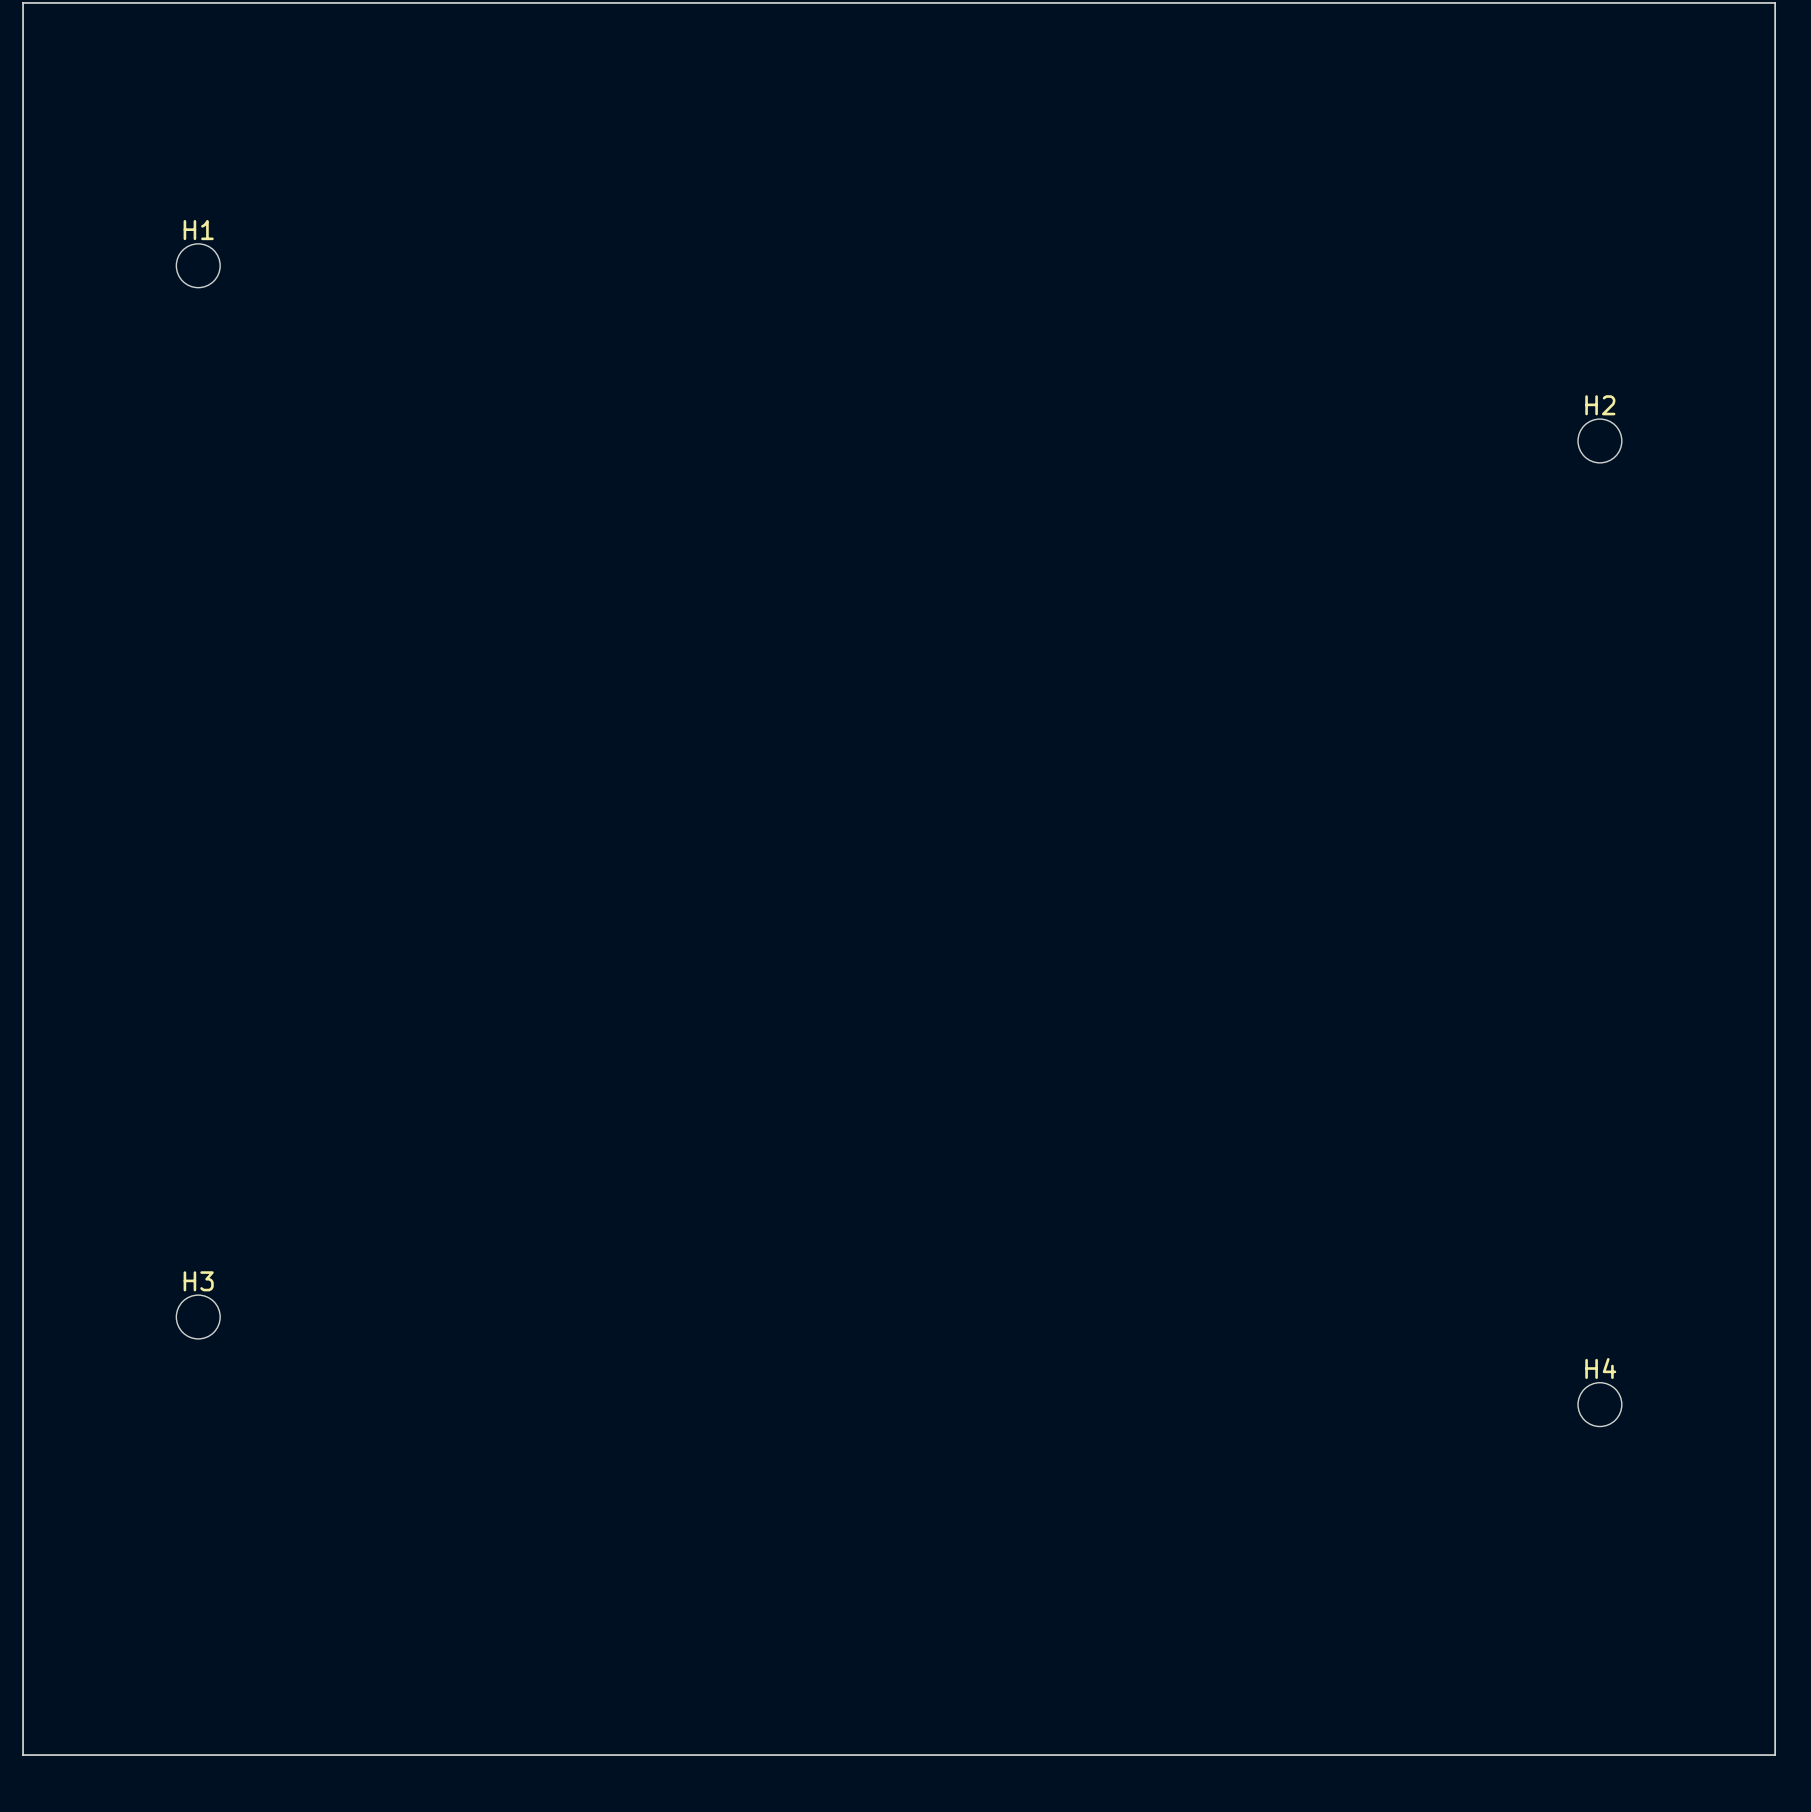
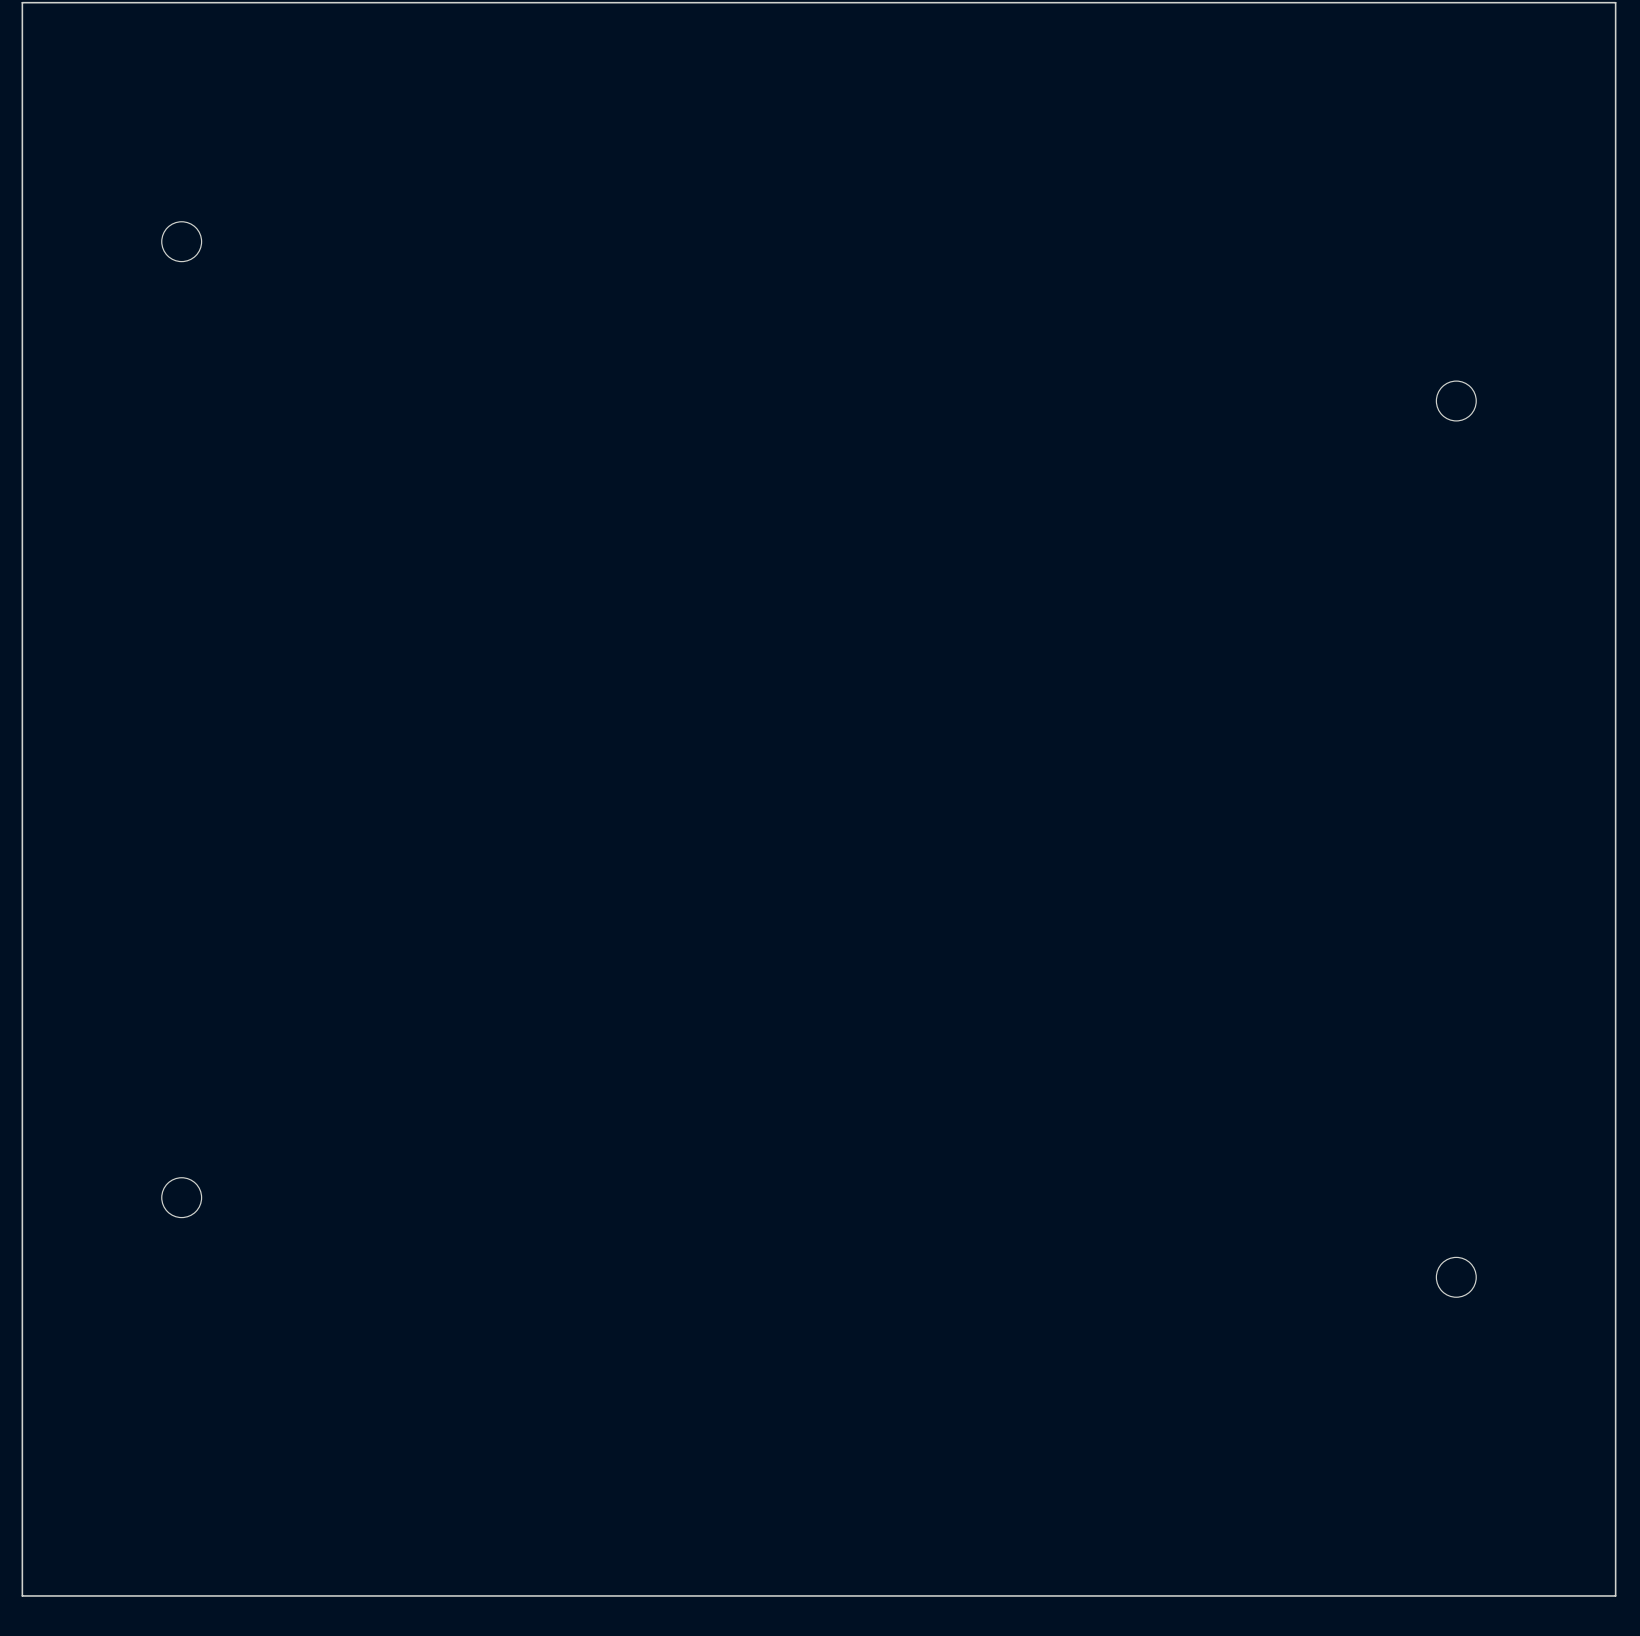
H1 name: H1 (198, 230) -> none
H2 name: H2 (1600, 405) -> none
H3 name: H3 (198, 1281) -> none
H4 name: H4 (1600, 1368) -> none

